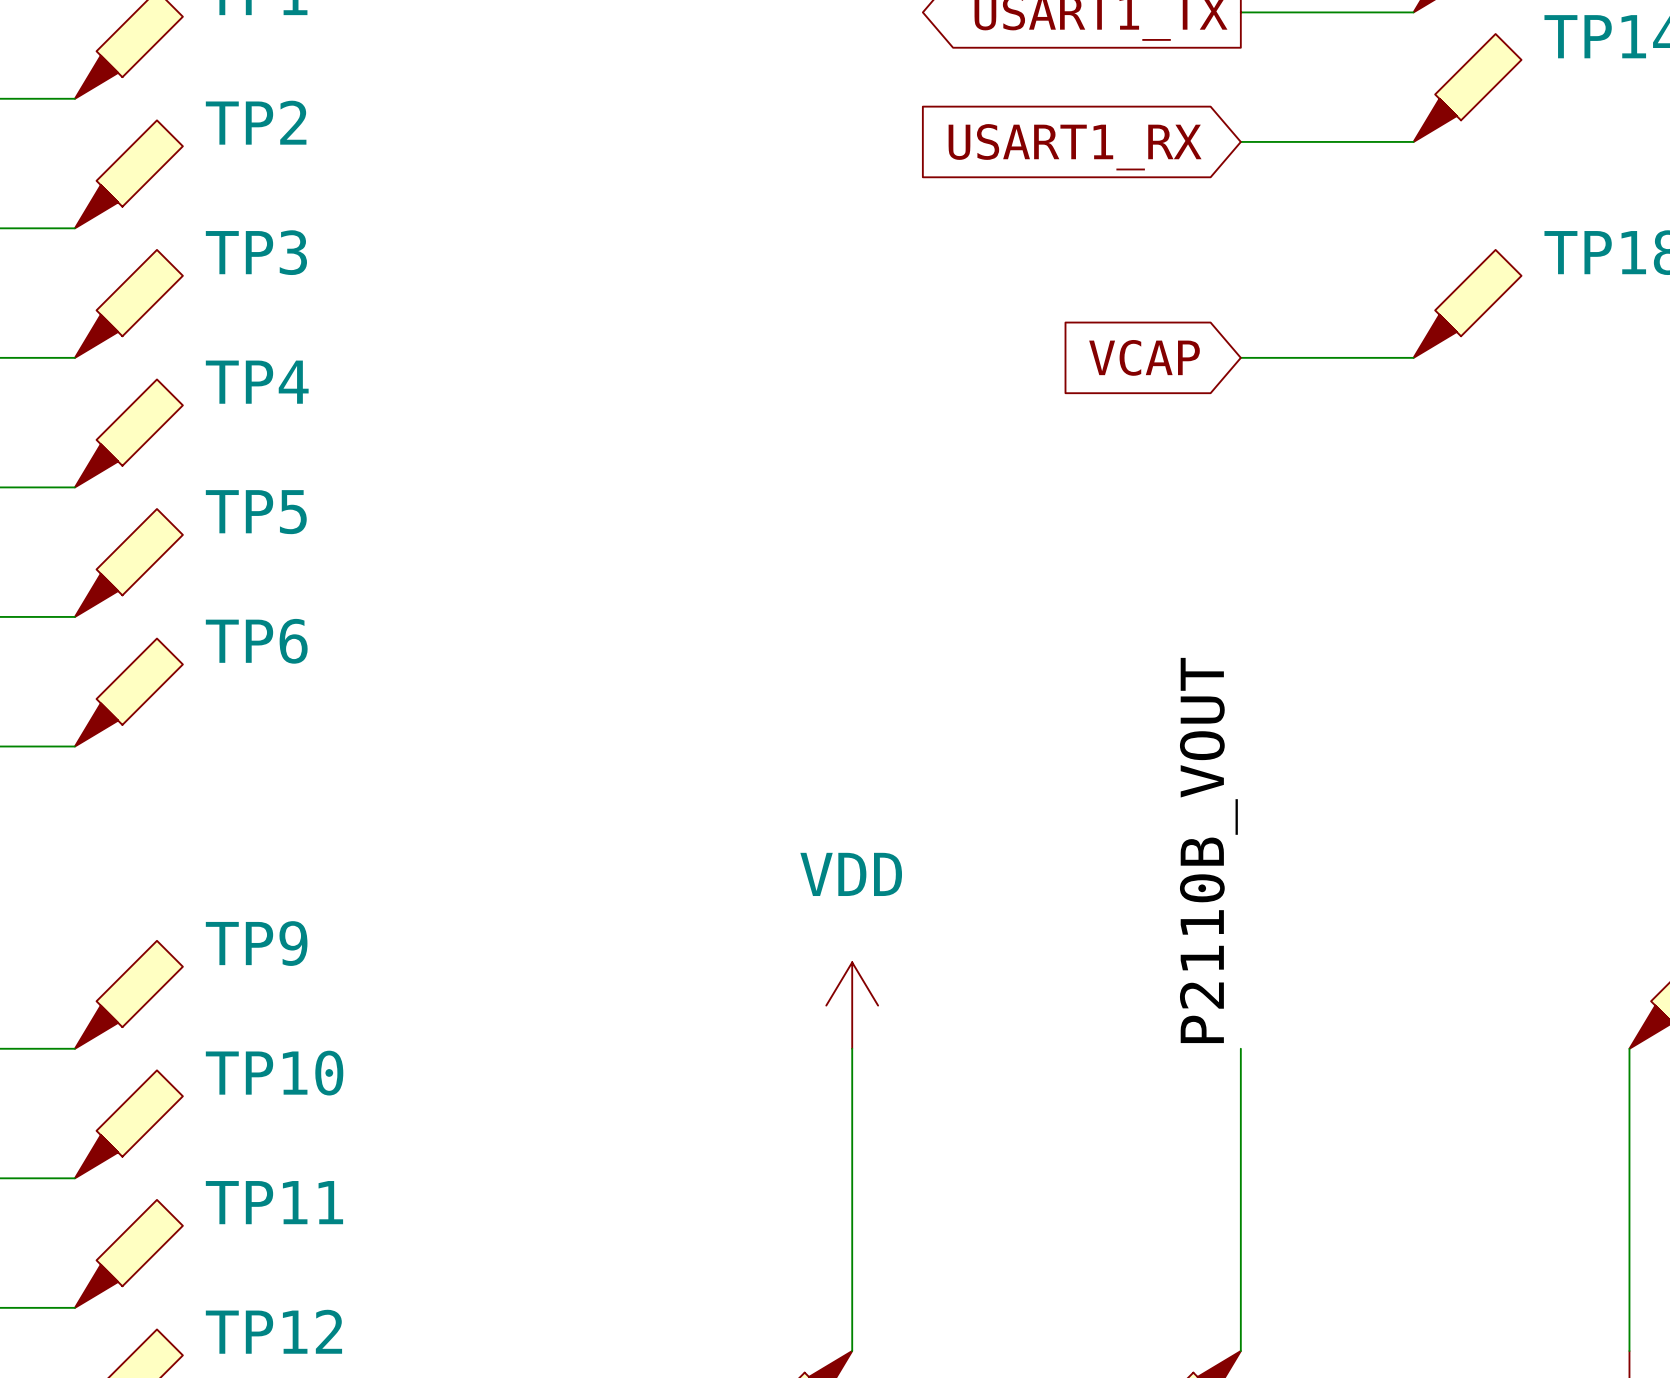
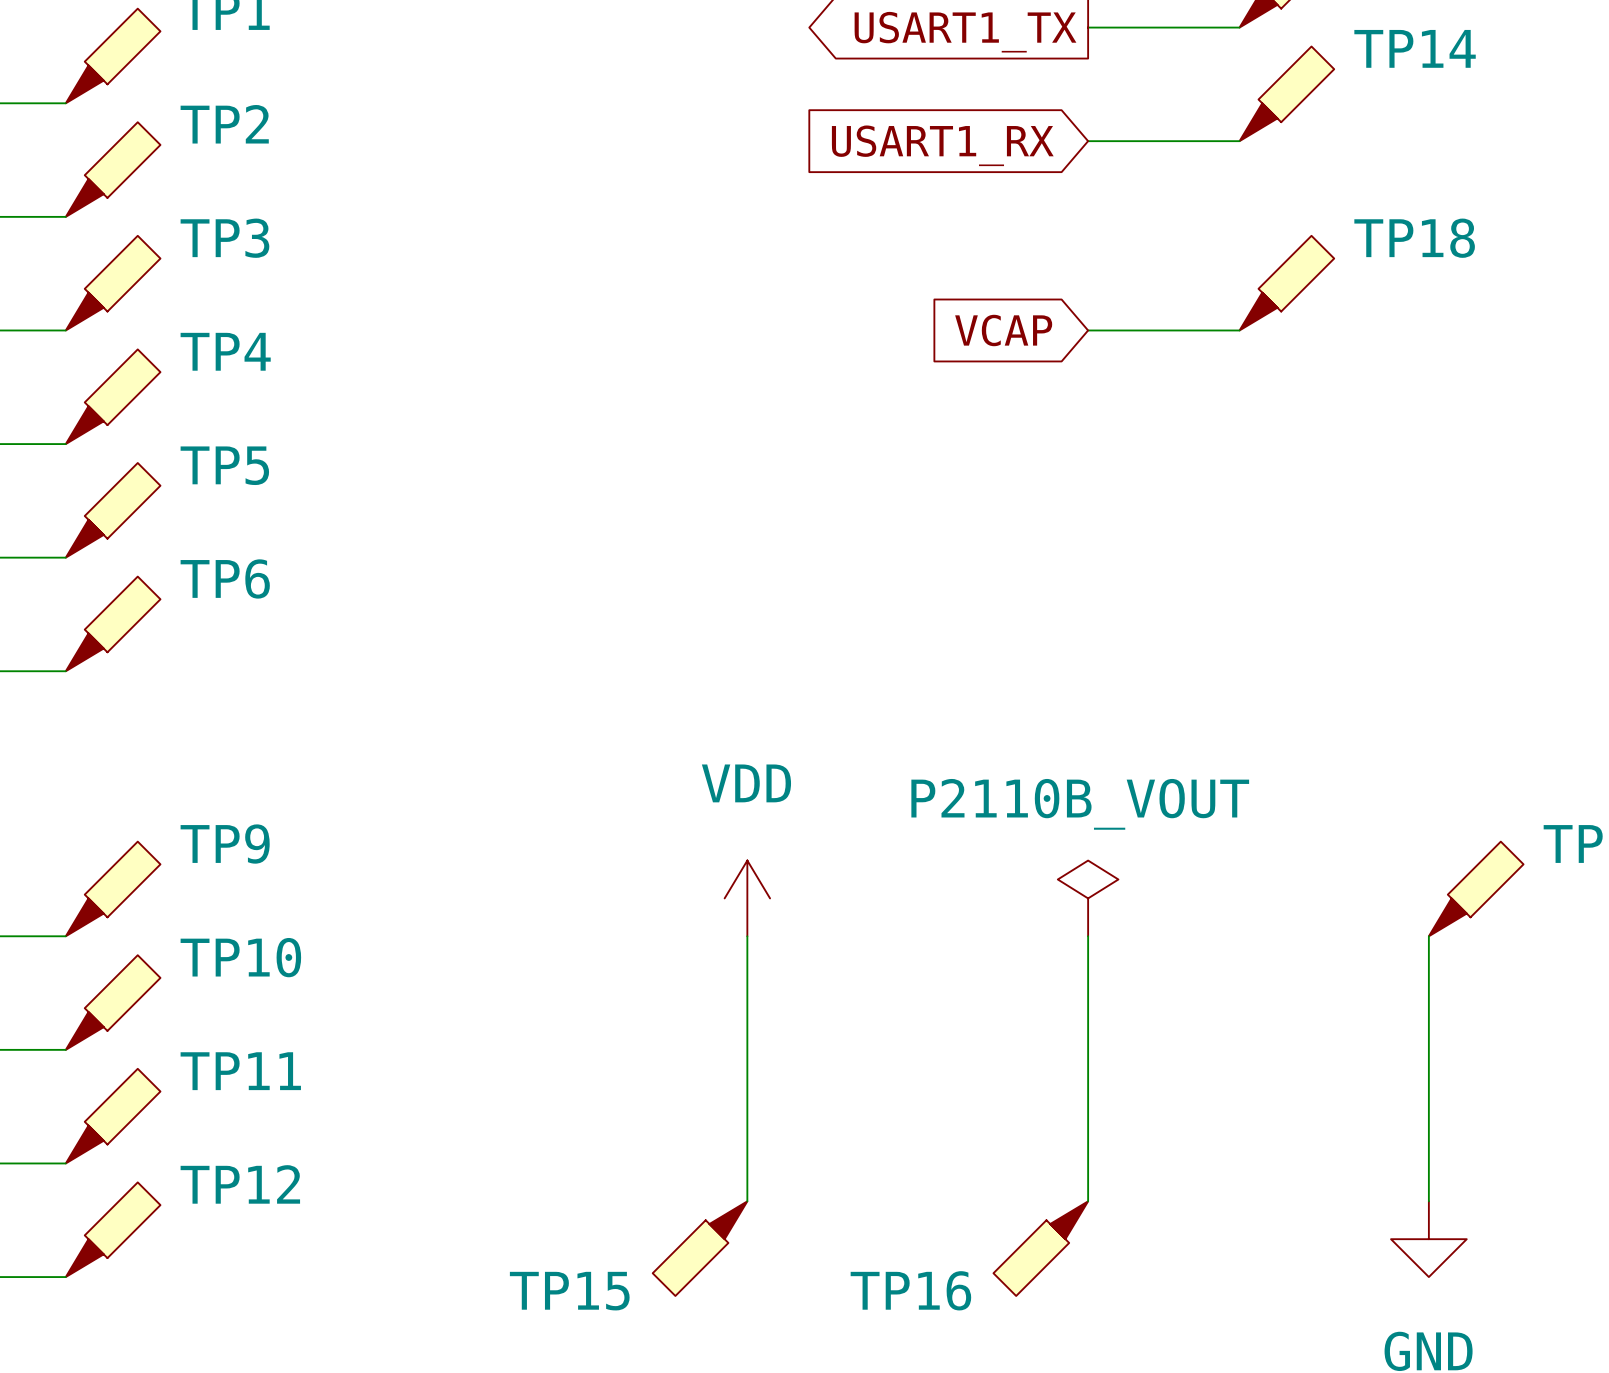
label: P2110B_VOUT (1208, 850) -> none
power symbol: none -> P2110B_VOUT (1088, 898)

